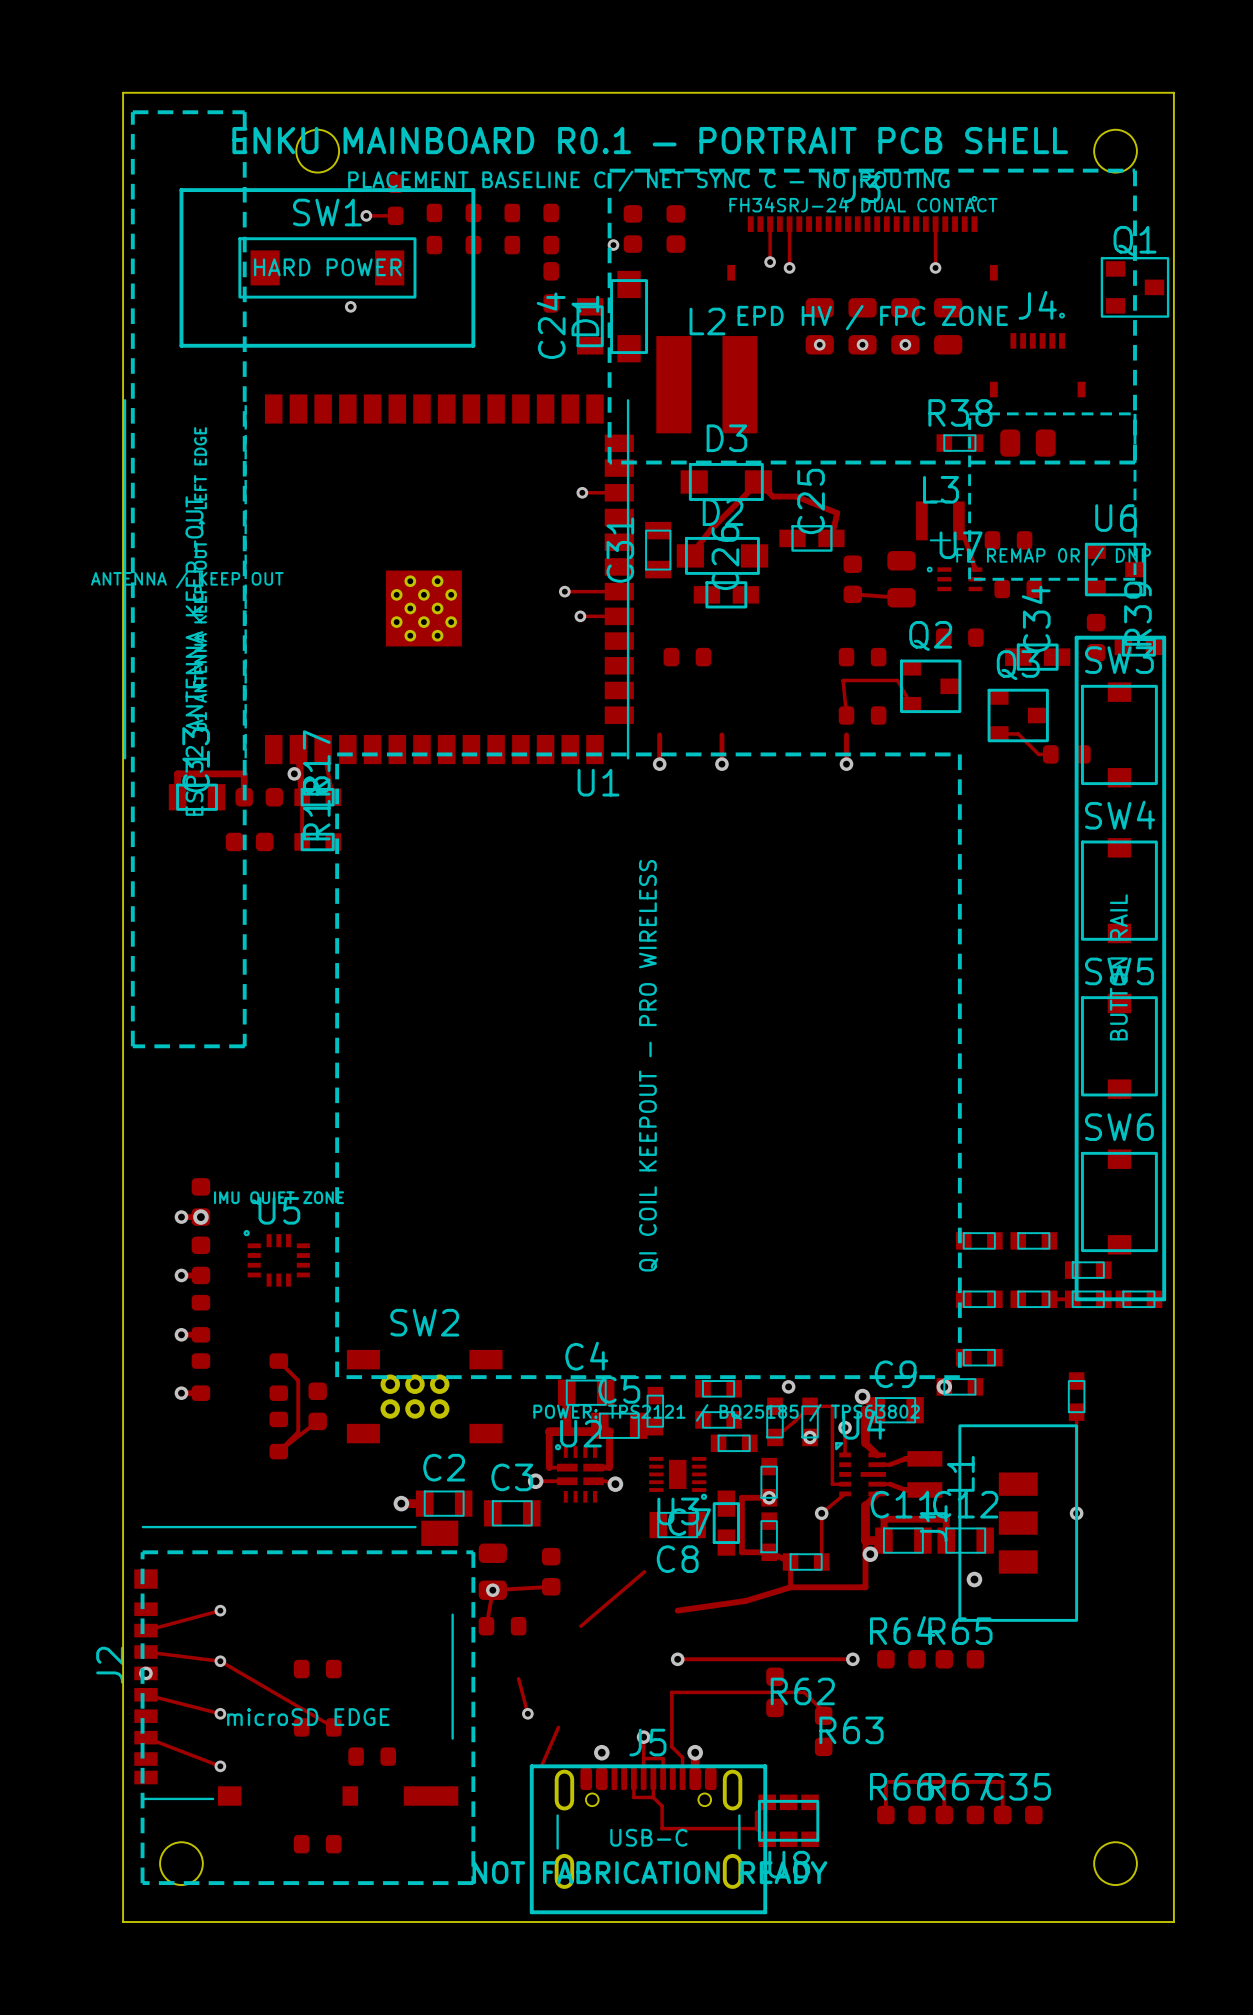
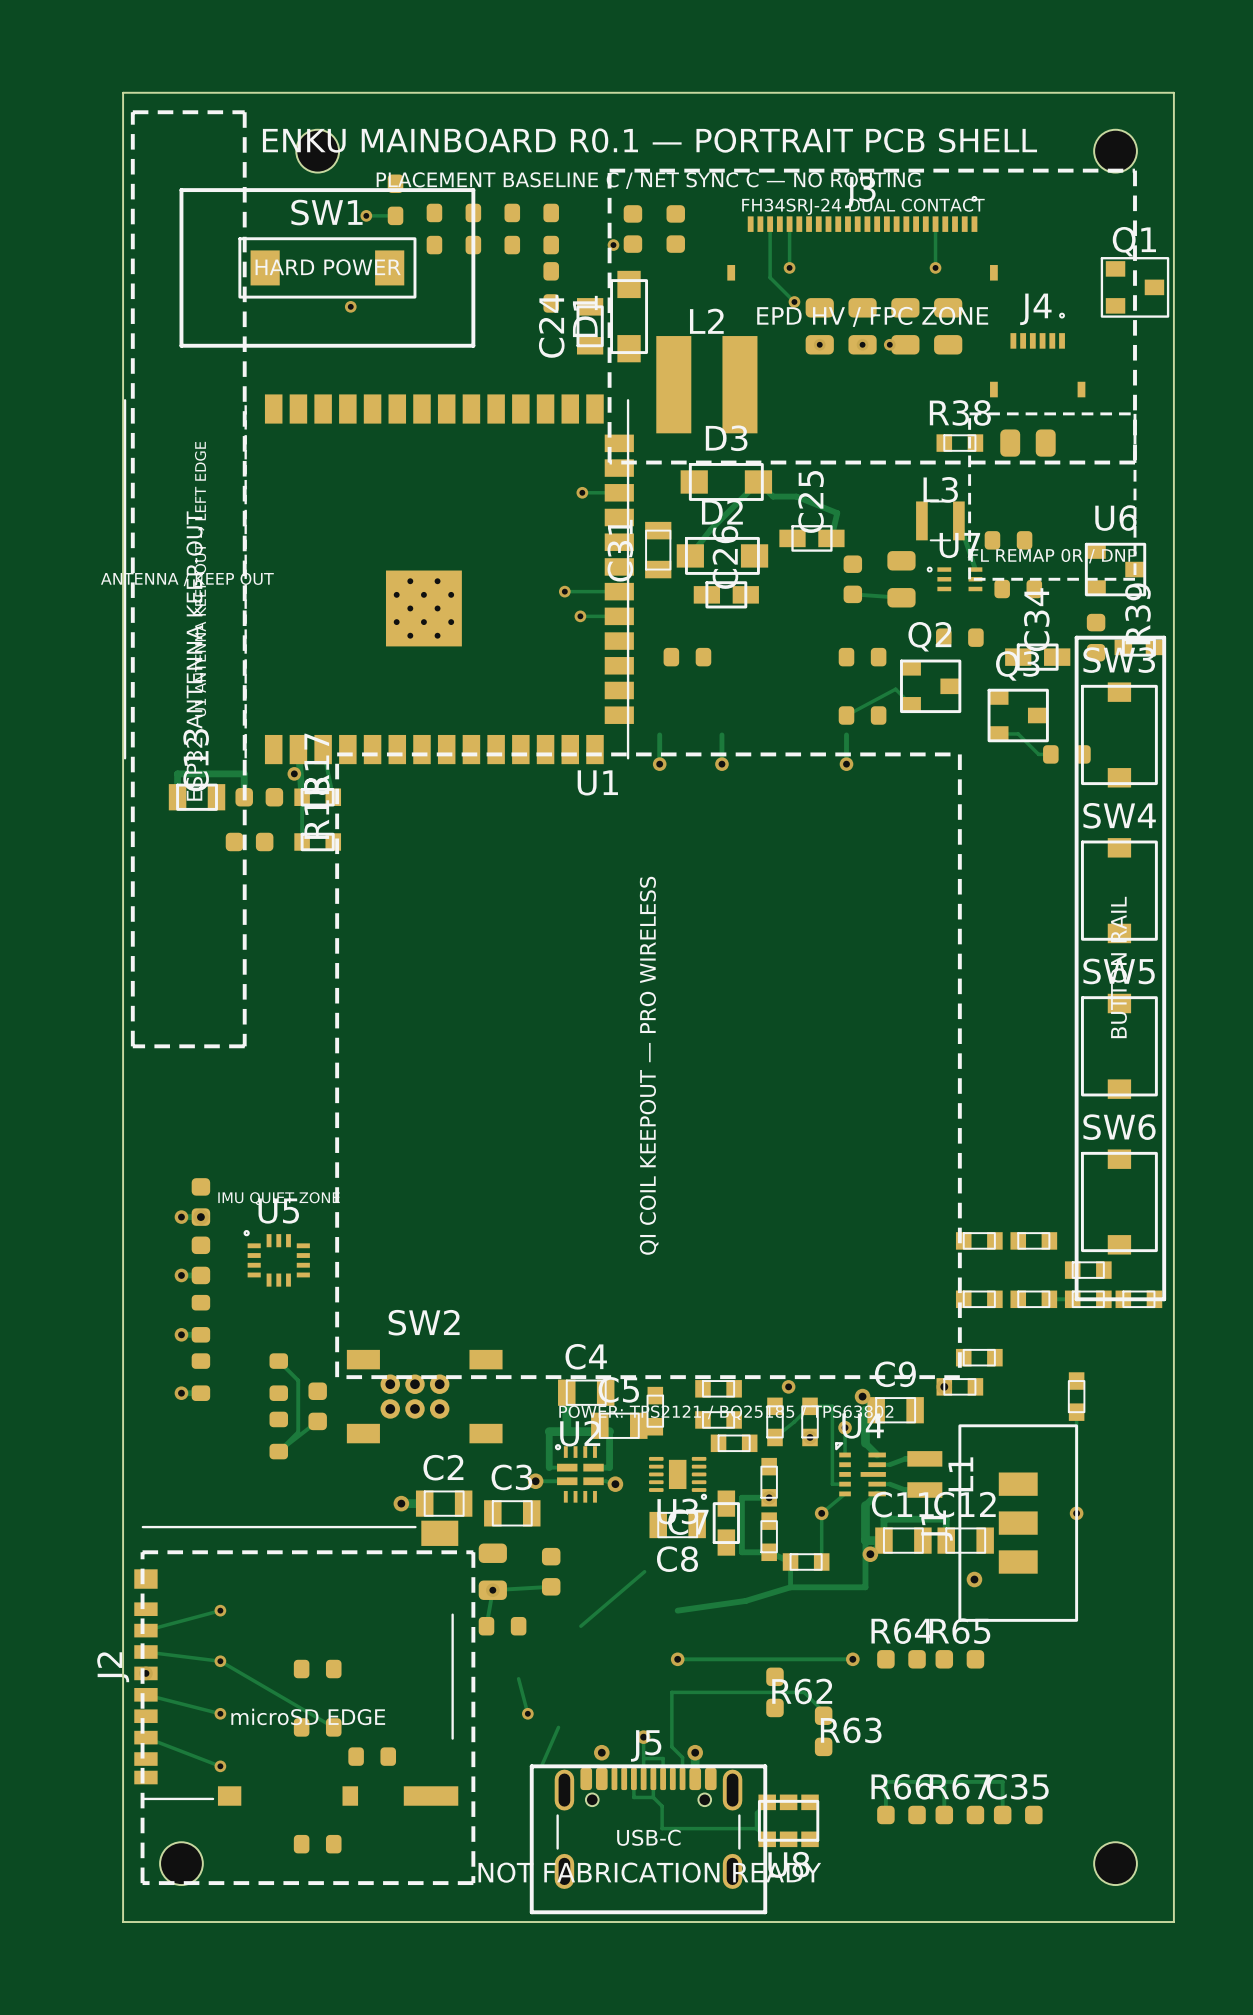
track: none -> (770, 262) (770, 277) (794, 301)
via: (770, 262) -> none
via: none -> (794, 301)
via: none -> (889, 344)
via: (905, 344) -> none
track: (911, 704) (897, 680) (843, 680) (846, 715) -> (911, 704) (895, 689) (846, 715)

